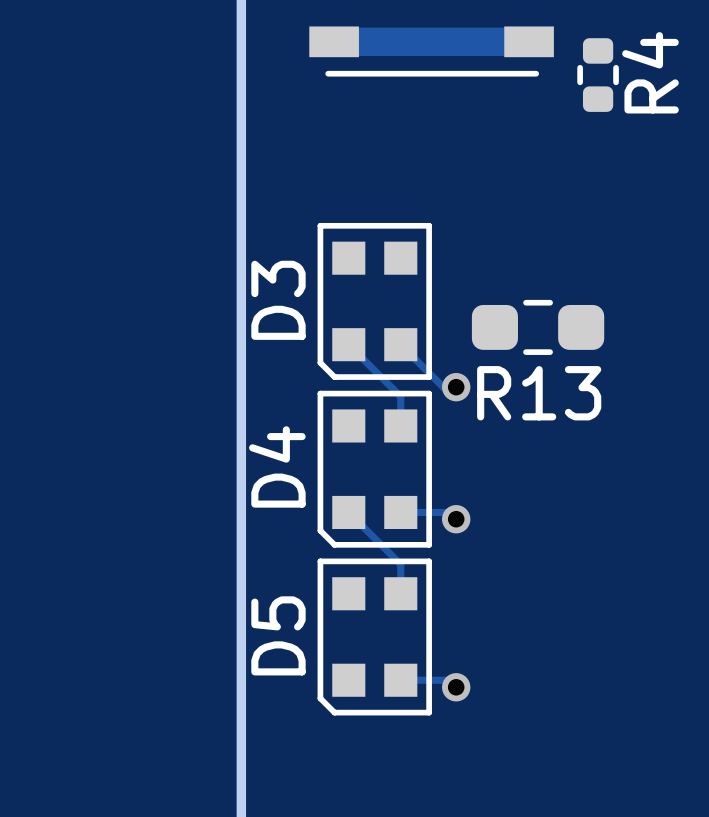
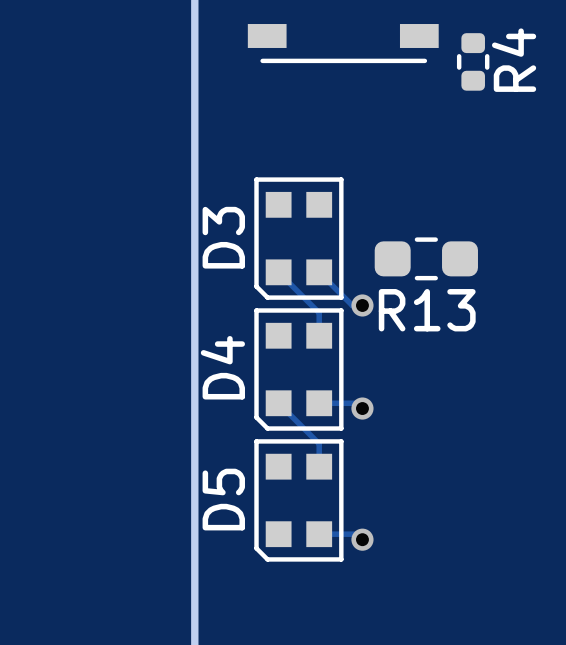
track: (334, 41) (529, 41) -> none

